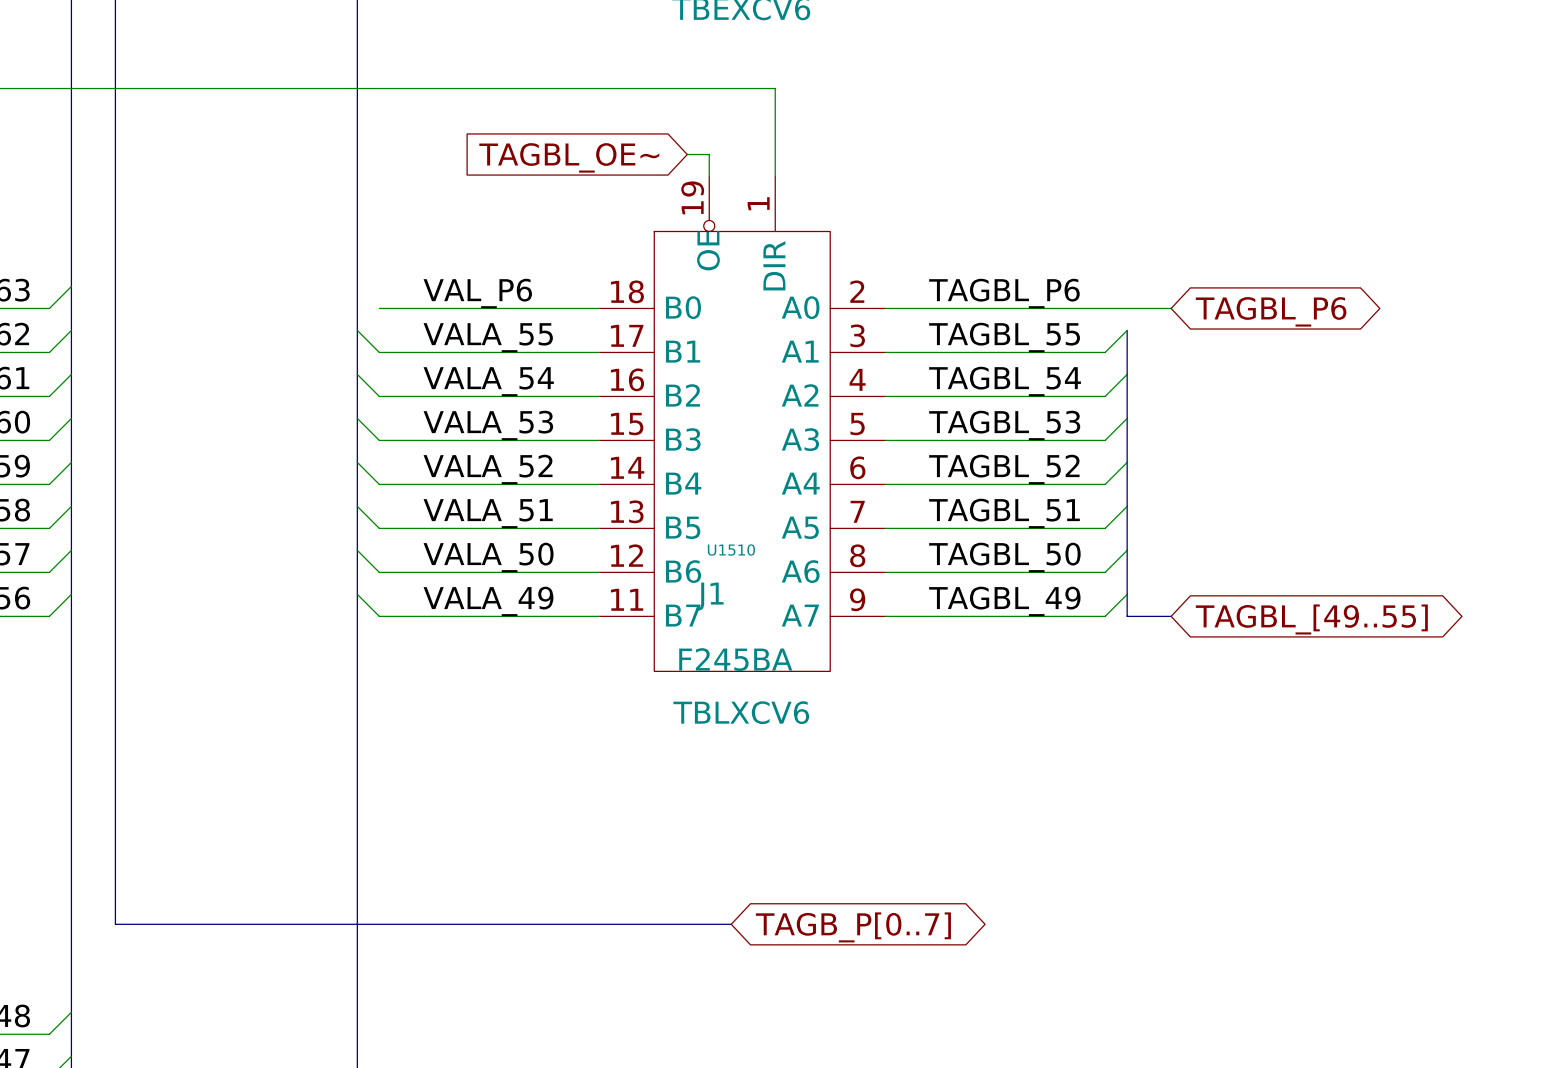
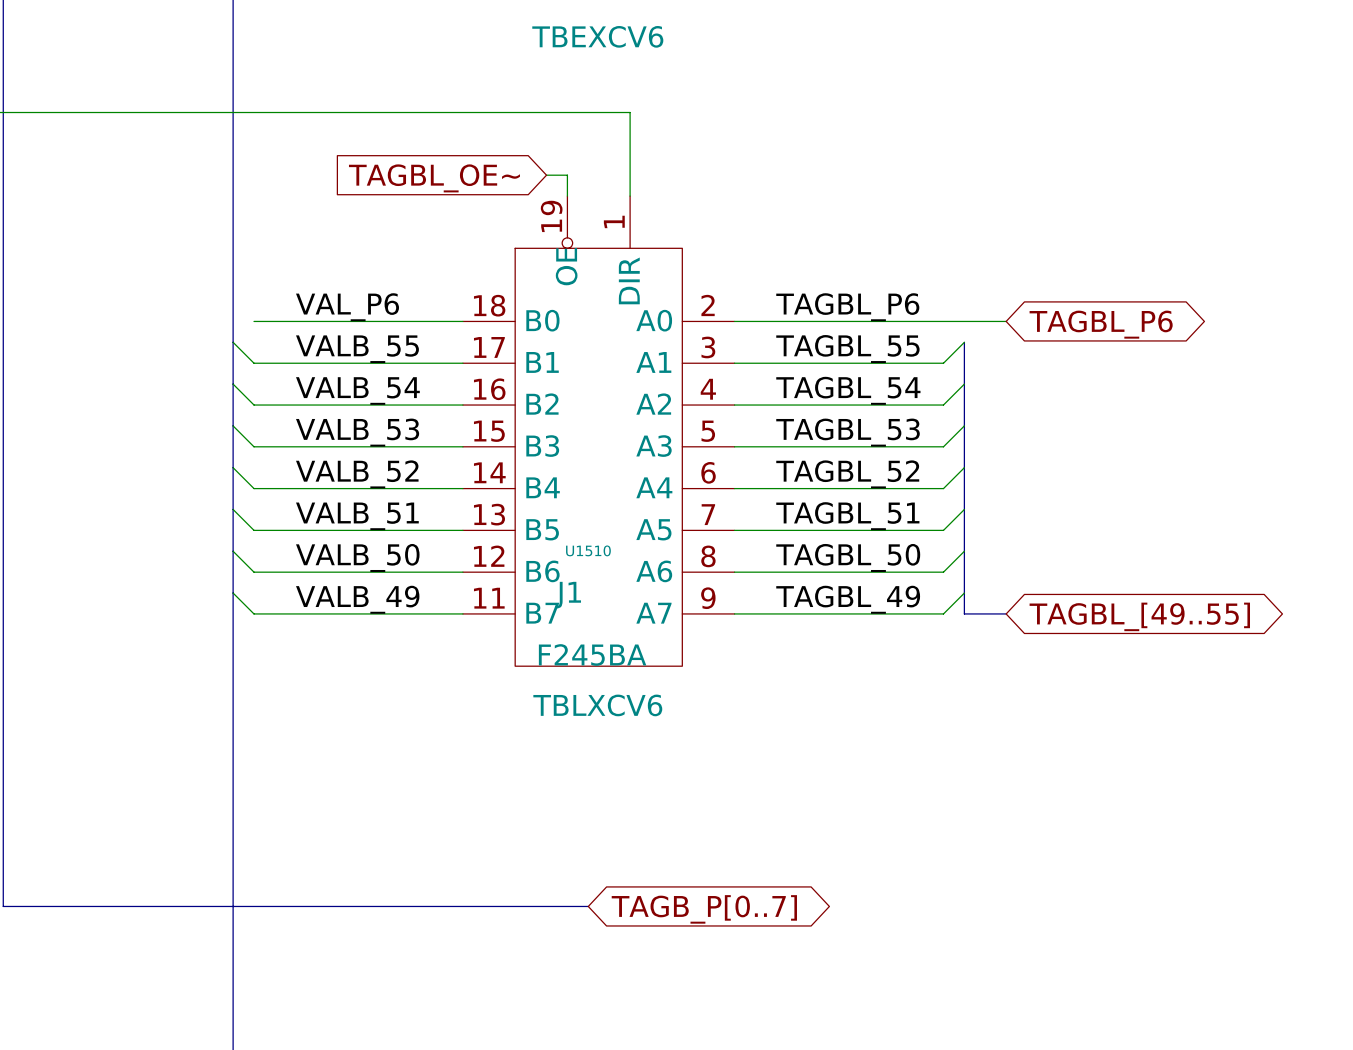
label: VALA_55 (488, 337) -> VALB_55 (357, 349)
label: VALA_54 (488, 381) -> VALB_54 (357, 391)
label: VALA_53 (488, 425) -> VALB_53 (357, 432)
label: VALA_52 (488, 469) -> VALB_52 (357, 474)
label: VALA_51 (488, 513) -> VALB_51 (357, 516)
label: VALA_50 (488, 557) -> VALB_50 (357, 557)
label: VALA_49 (488, 601) -> VALB_49 (357, 599)

